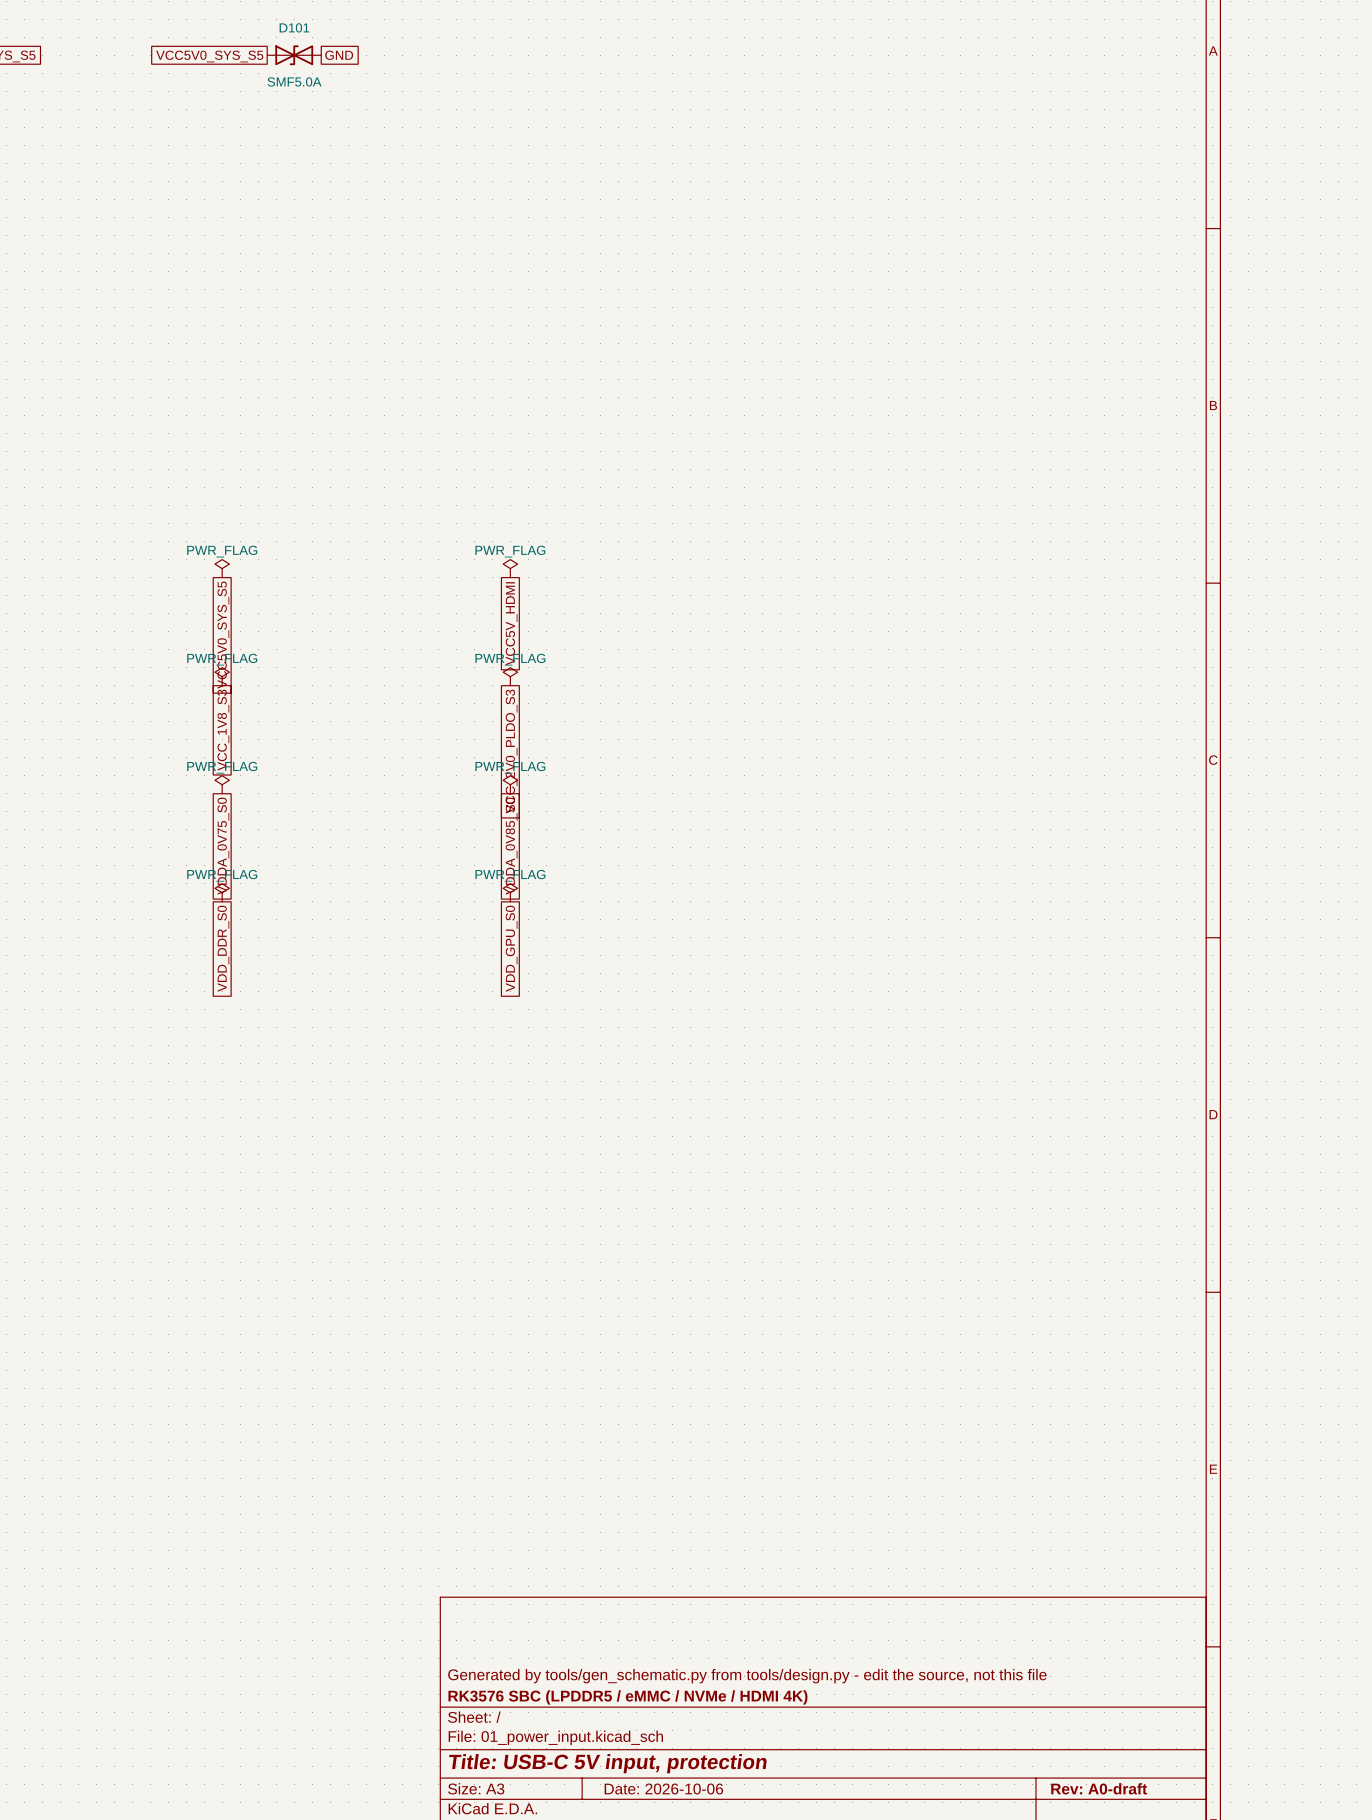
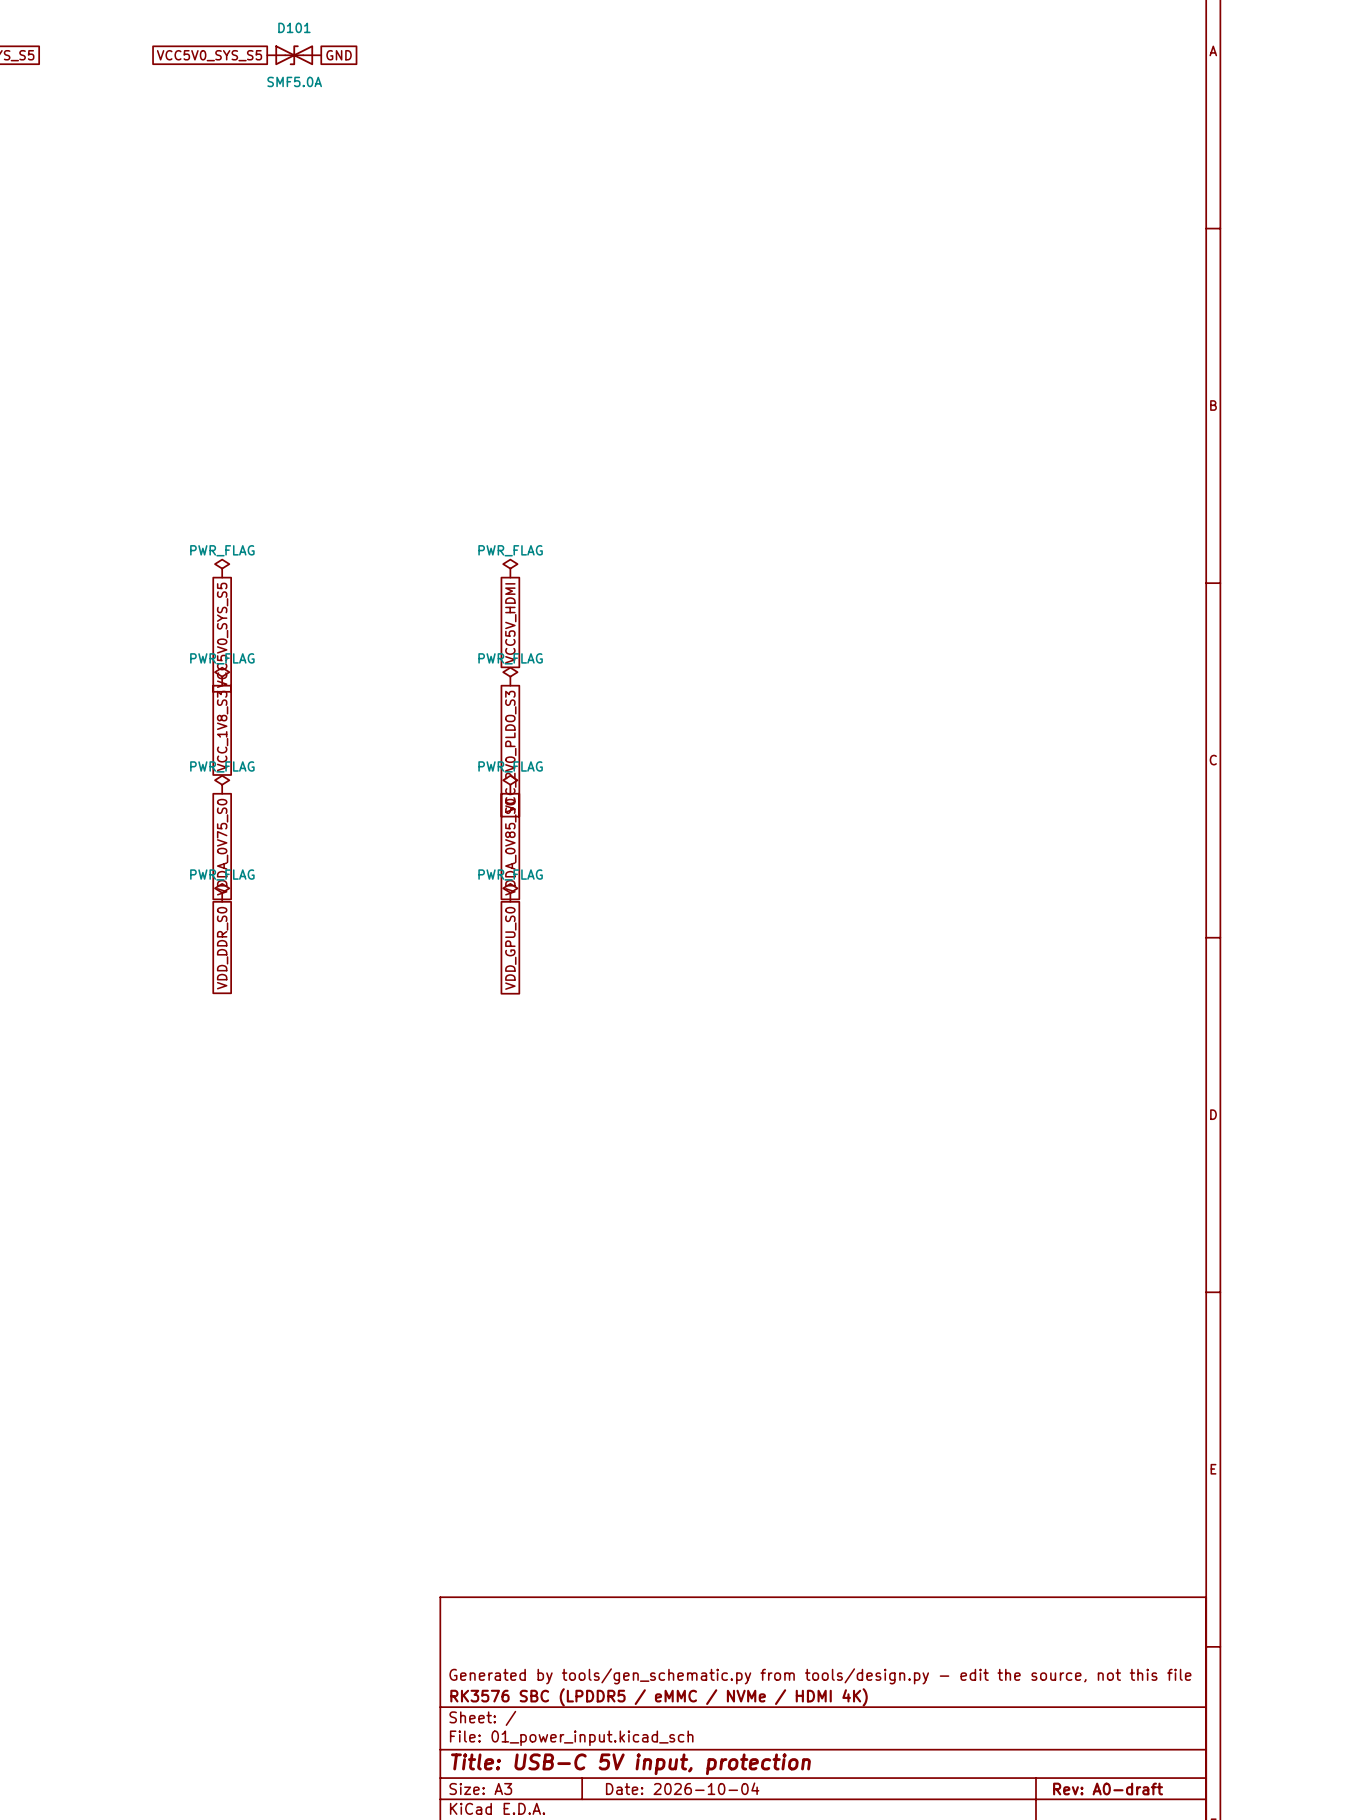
title block: Date: 2026-10-06 (663, 1789) -> Date: 2026-10-04 (682, 1788)

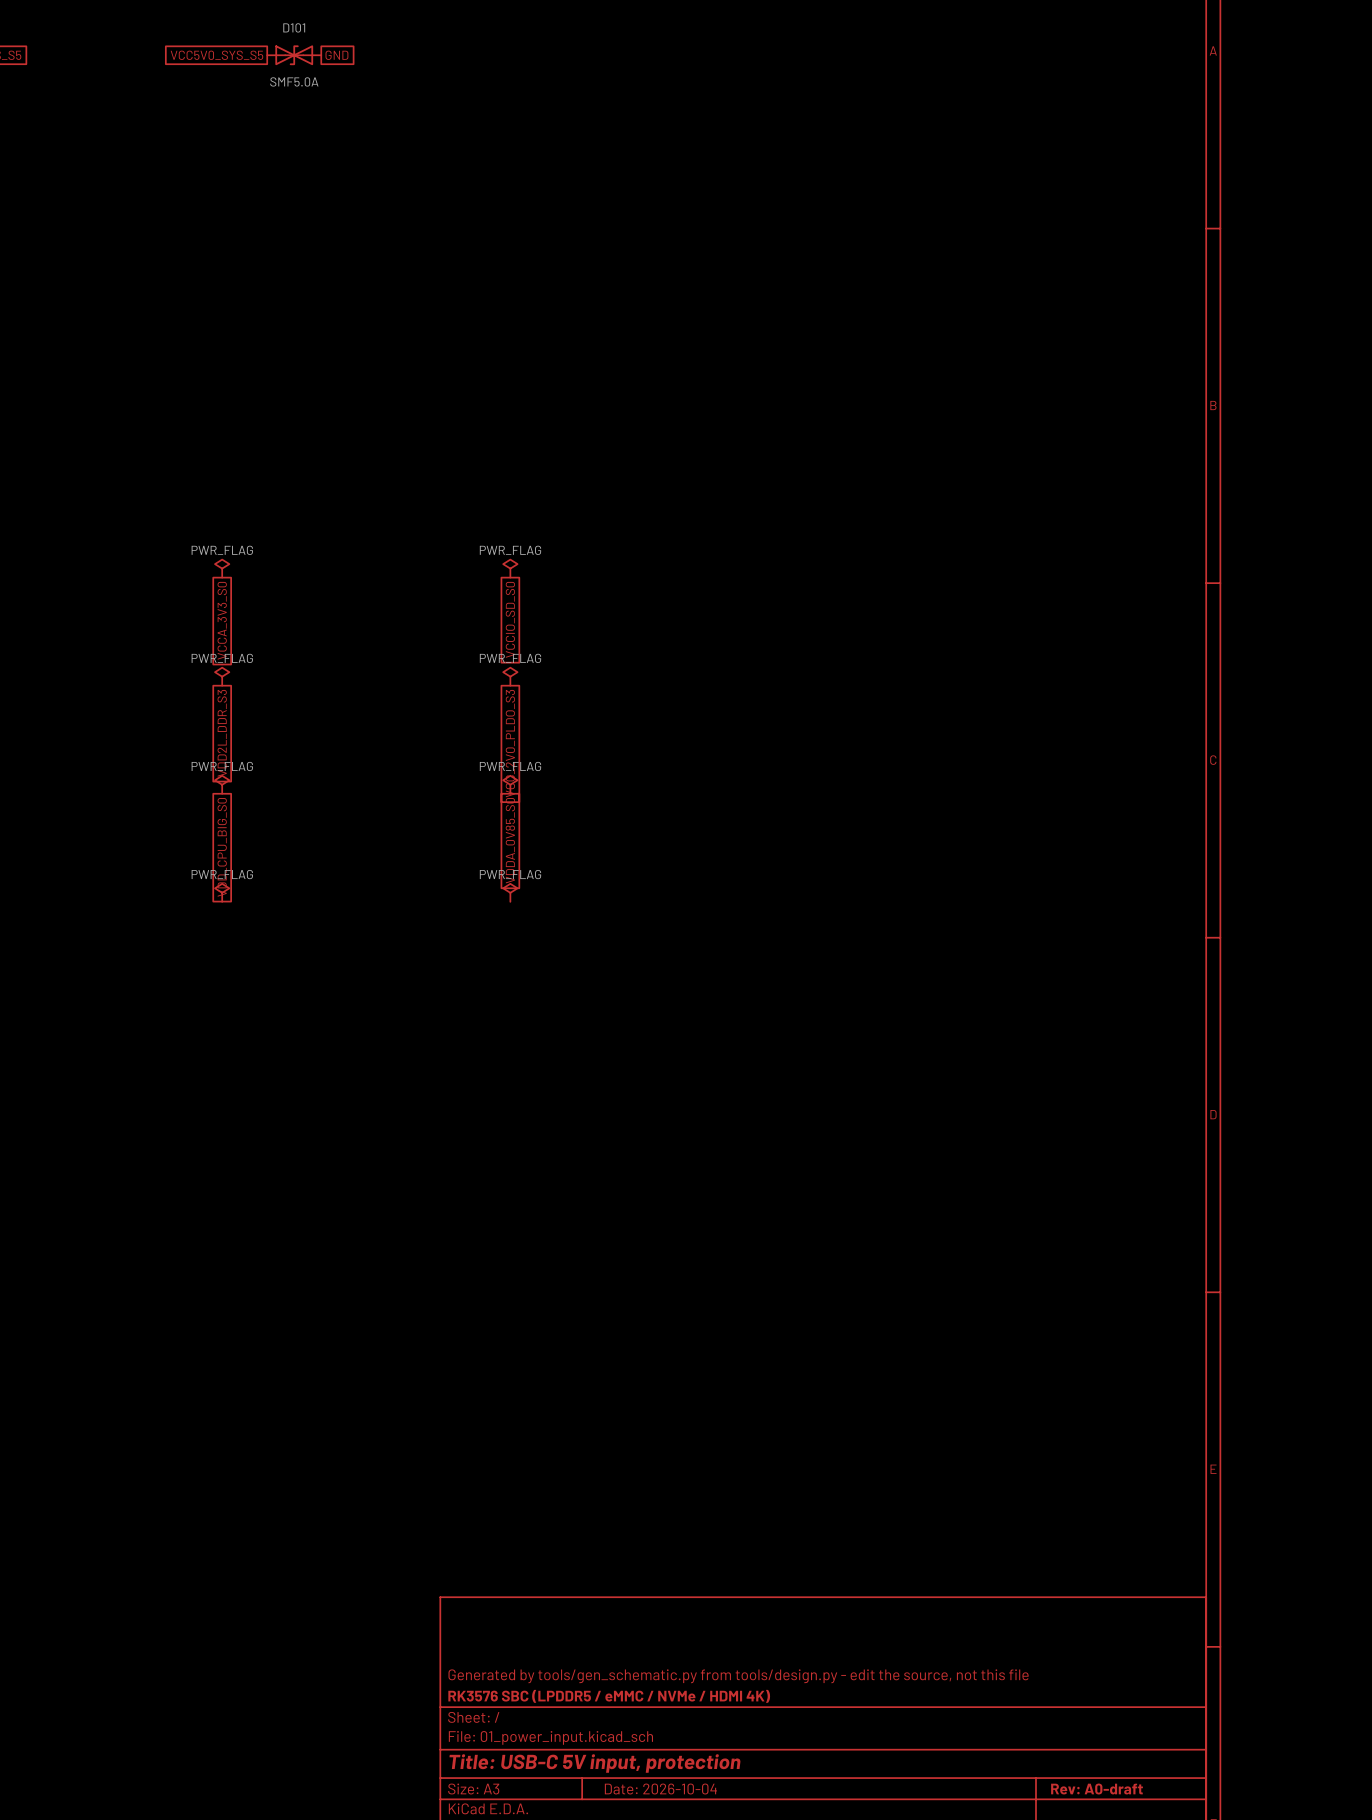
global label: VCC5V_HDMI (510, 623) -> VCCIO_SD_S0 (510, 619)
global label: VCC5V0_SYS_S5 (222, 635) -> VCCA_3V3_S0 (222, 620)
global label: VCC_1V8_S3 (222, 730) -> VDD2L_DDR_S3 (222, 733)
global label: VDDA_0V75_S0 (222, 847) -> VDD_CPU_BIG_S0 (222, 847)
global label: VDD_DDR_S0 (222, 948) -> none
global label: VDD_GPU_S0 (510, 948) -> none

